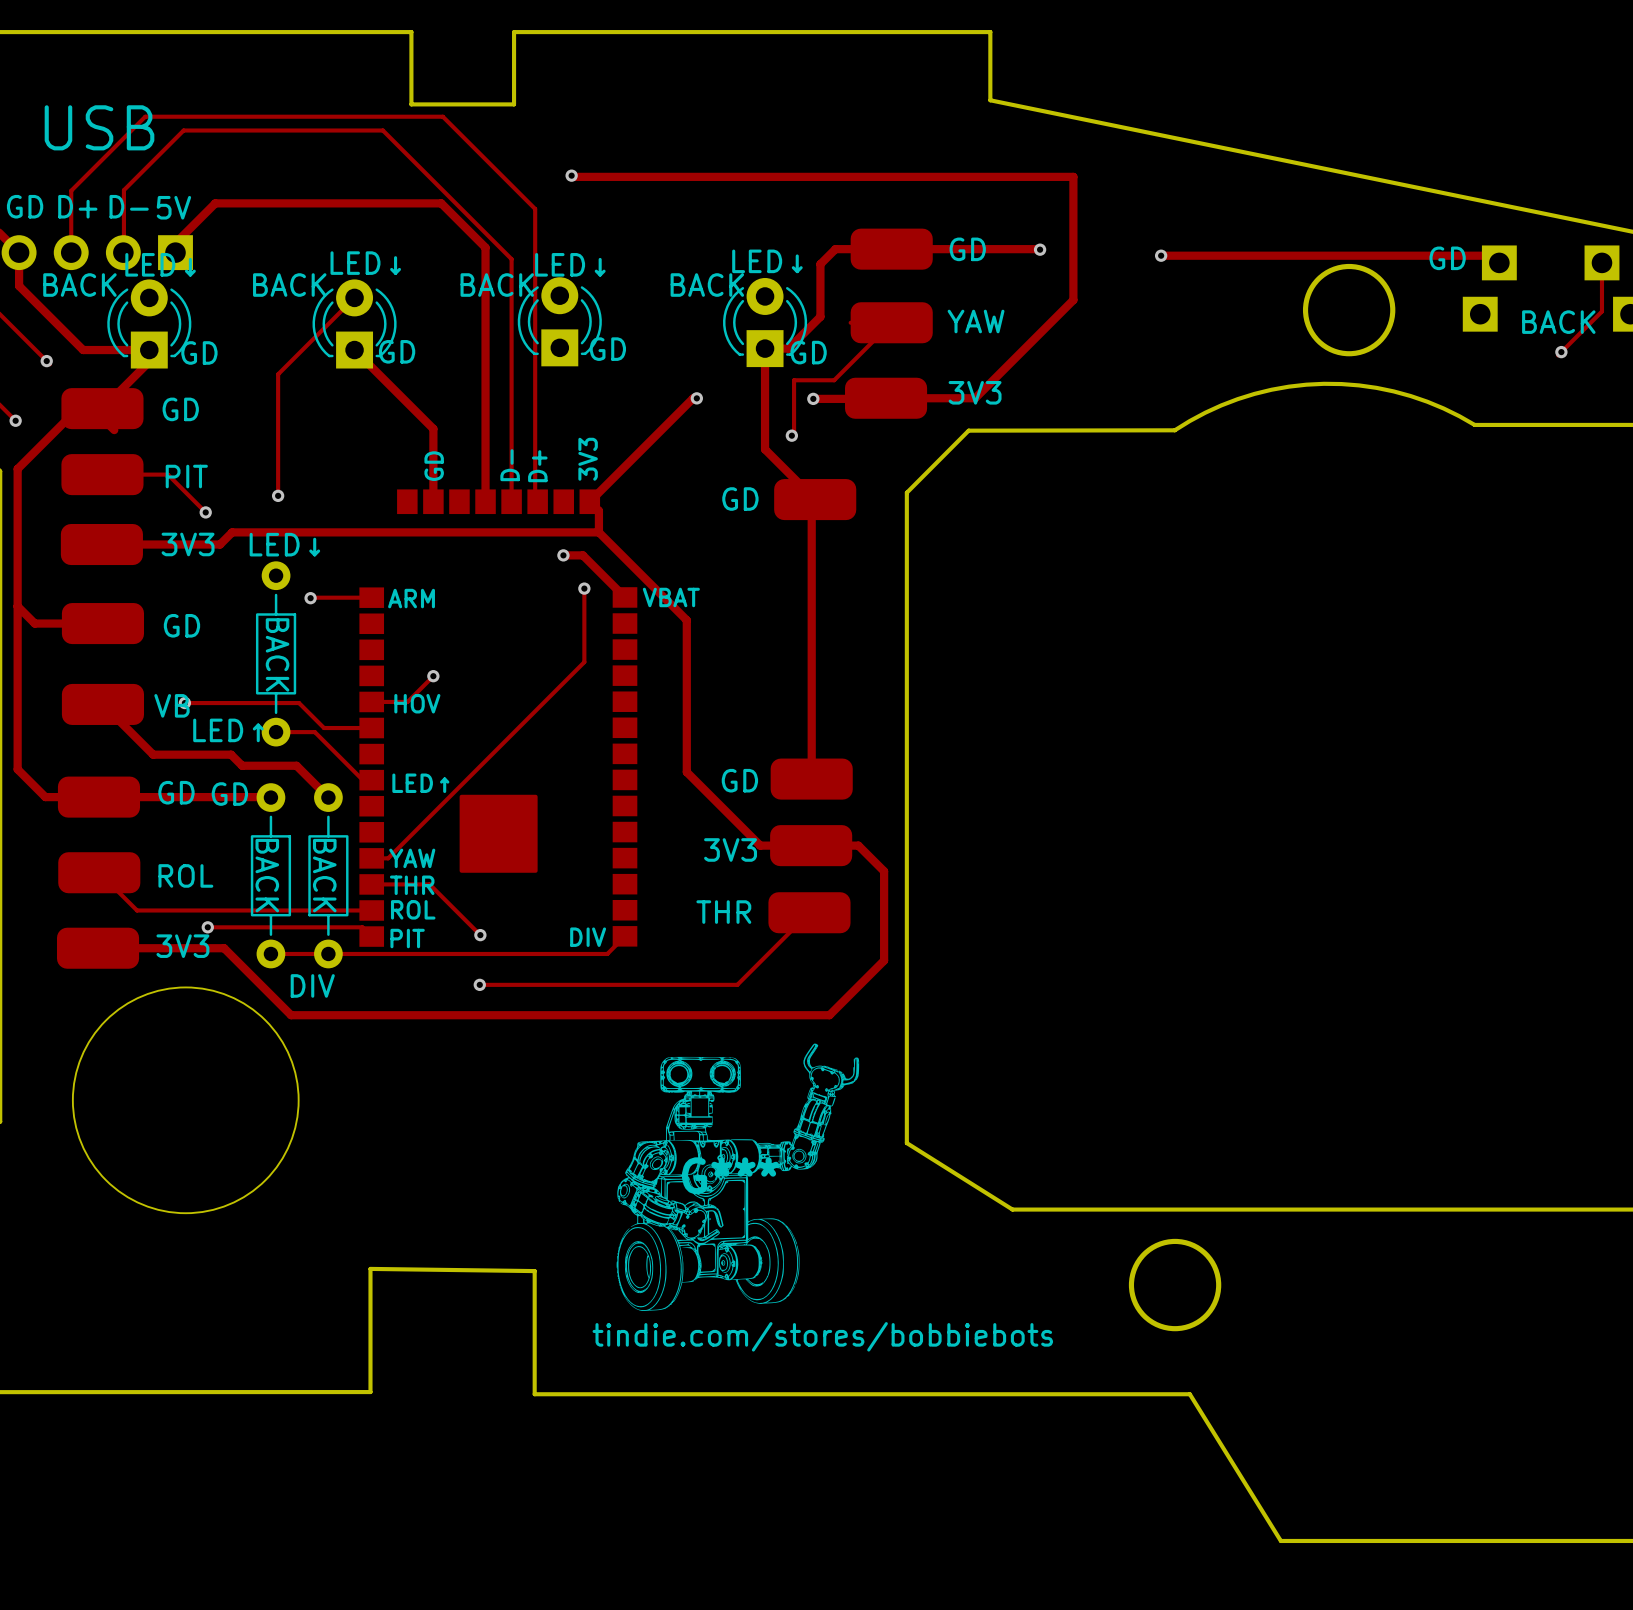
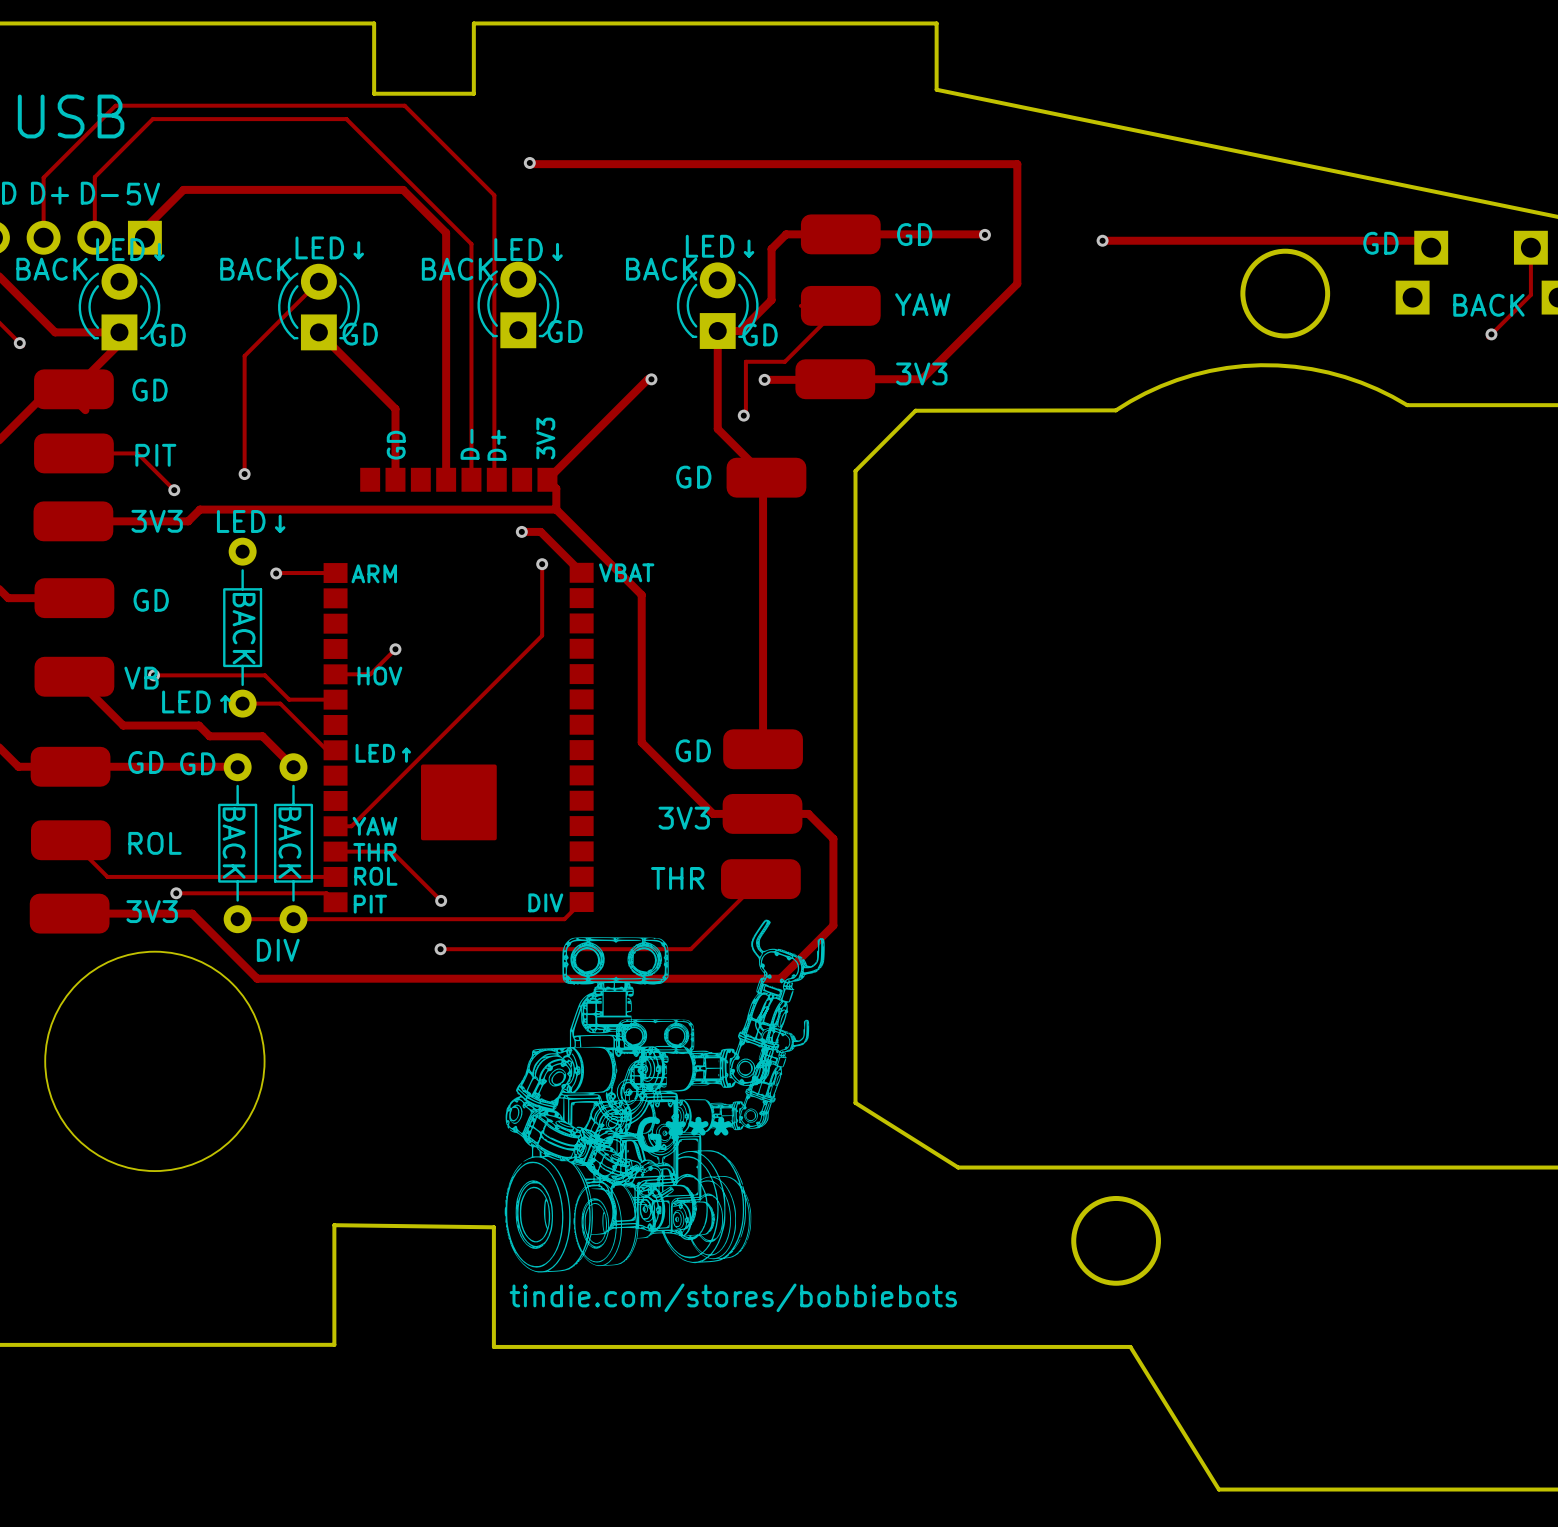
drawing: none -> [504, 919, 825, 1273]
text position: tindie.com/stores/bobbiebots (822, 1336) -> tindie.com/stores/bobbiebots (733, 1297)

